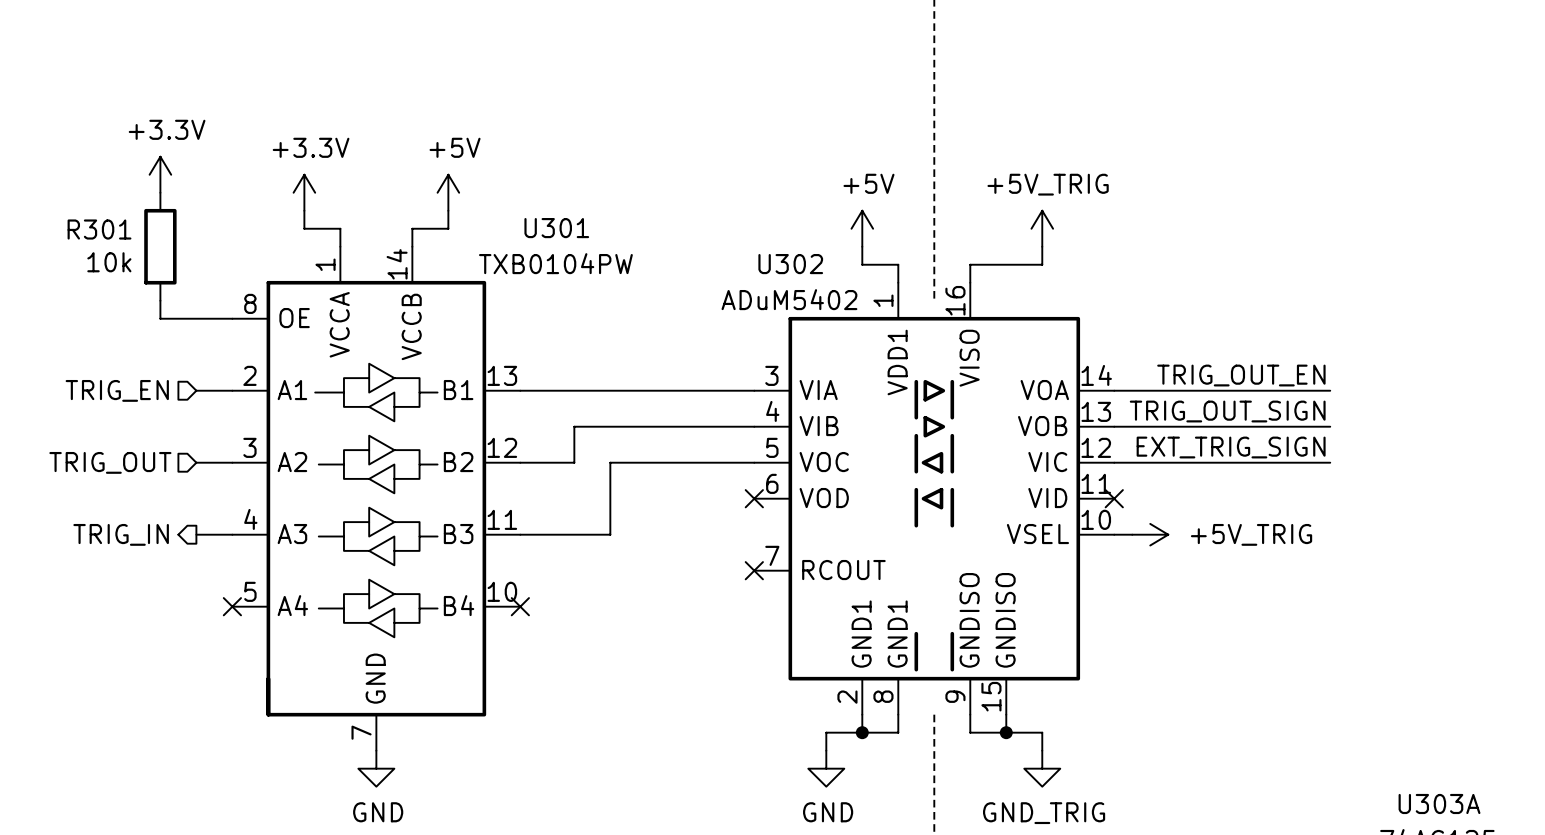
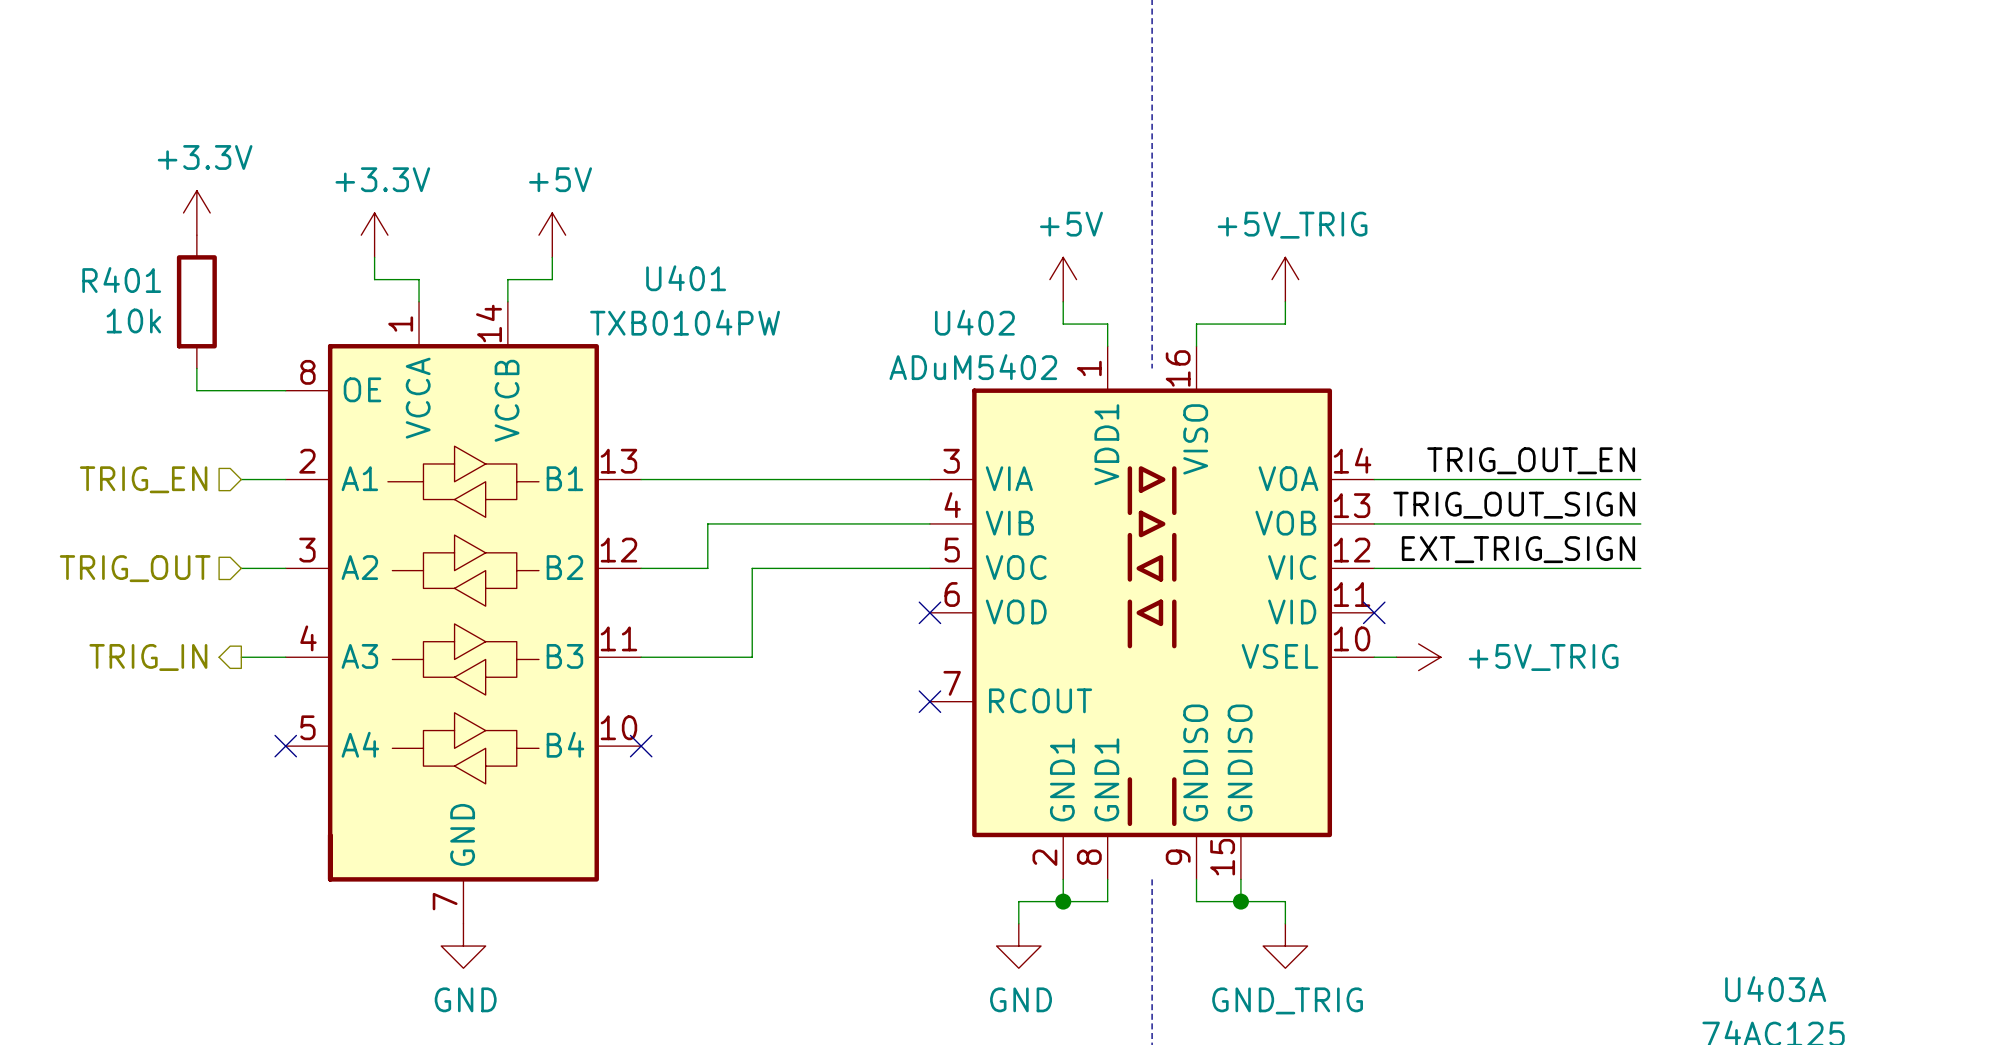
U301 name: U301 (556, 228) -> U401 (686, 278)
R301 name: R301 (99, 229) -> R401 (121, 280)
U302 name: U302 (790, 264) -> U402 (974, 322)
U303A name: U303A (1439, 803) -> U403A (1775, 989)

